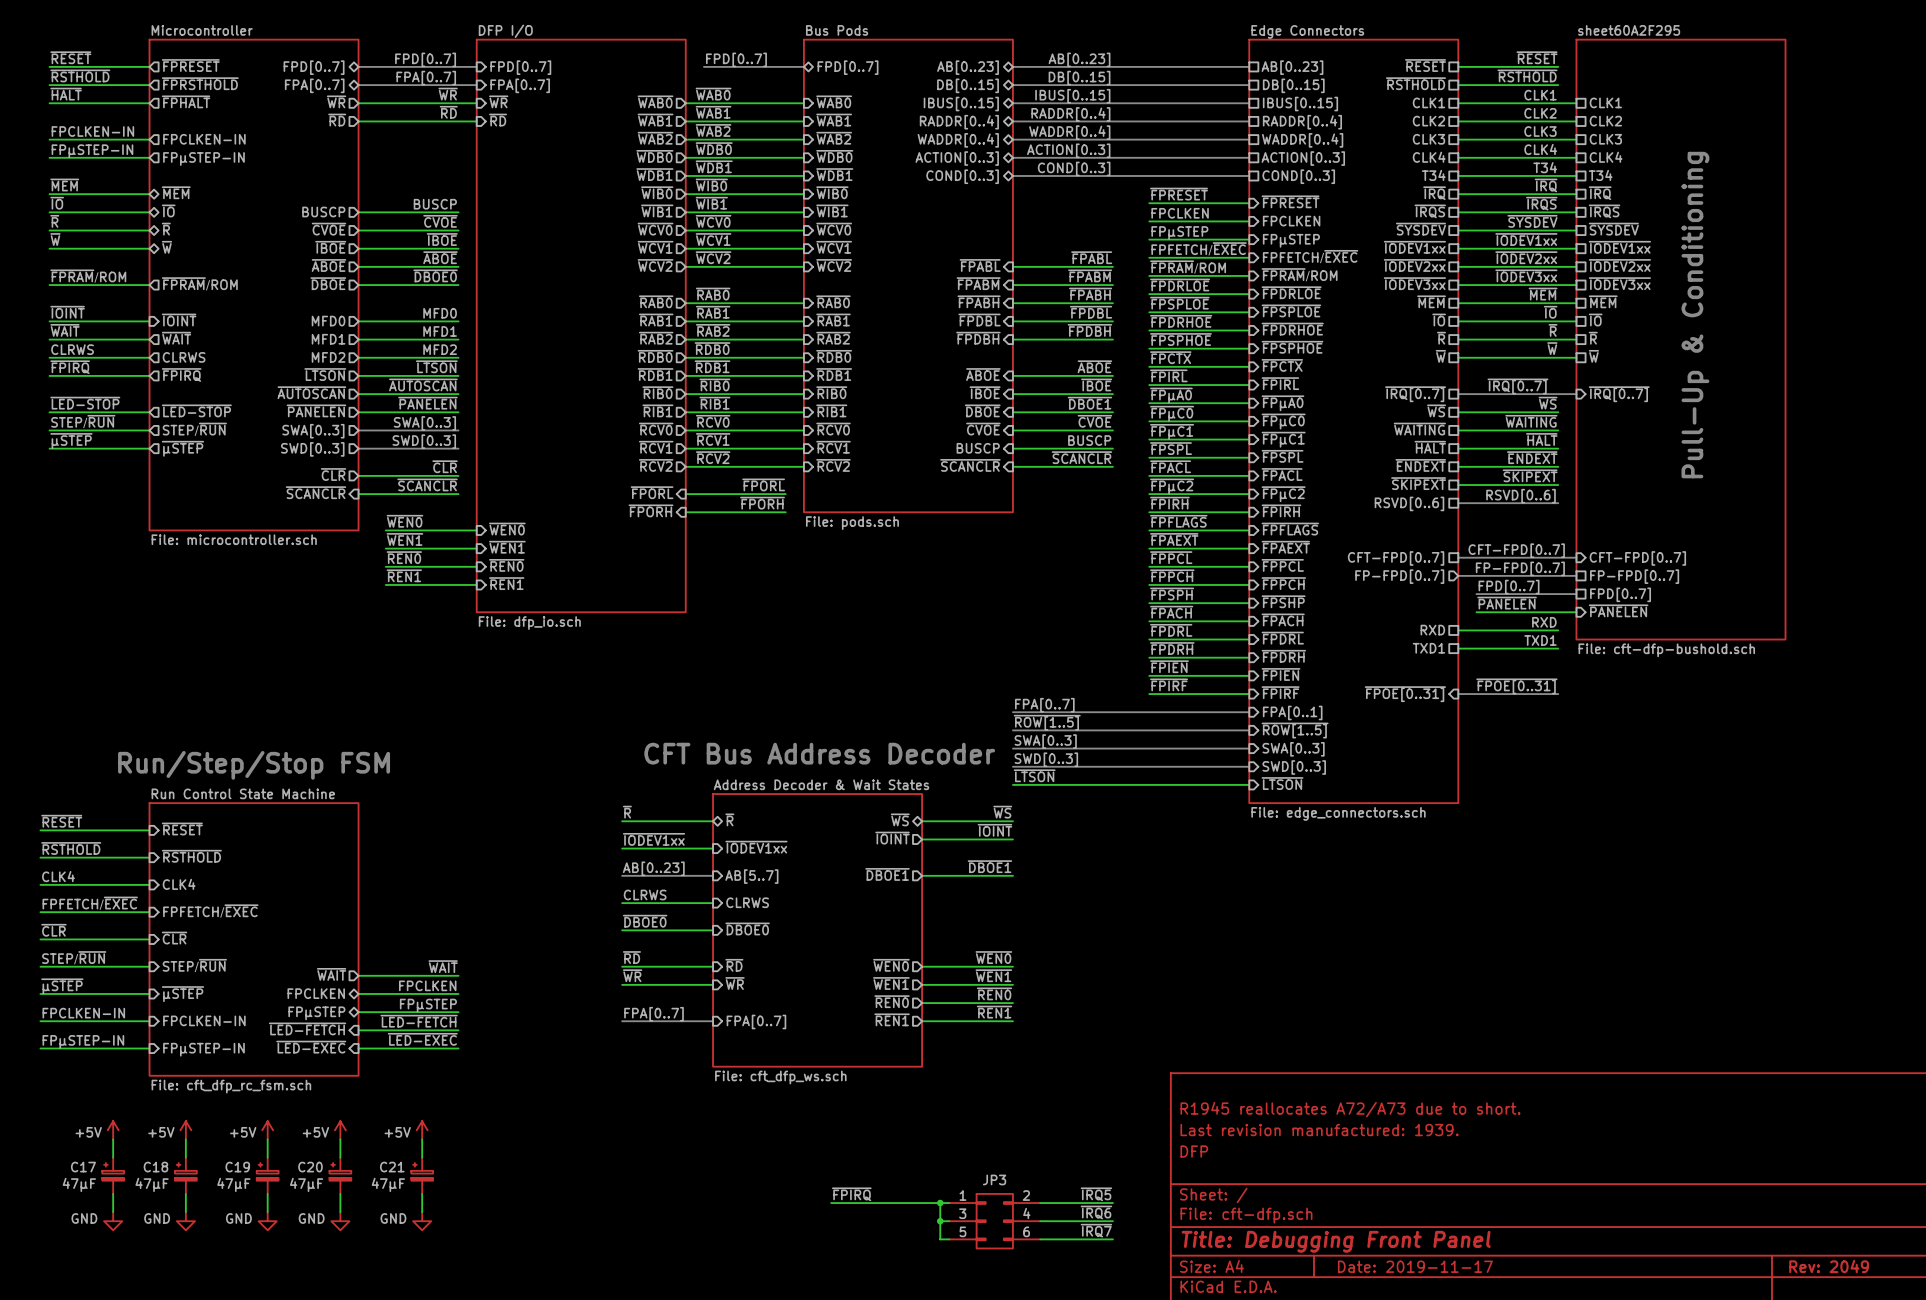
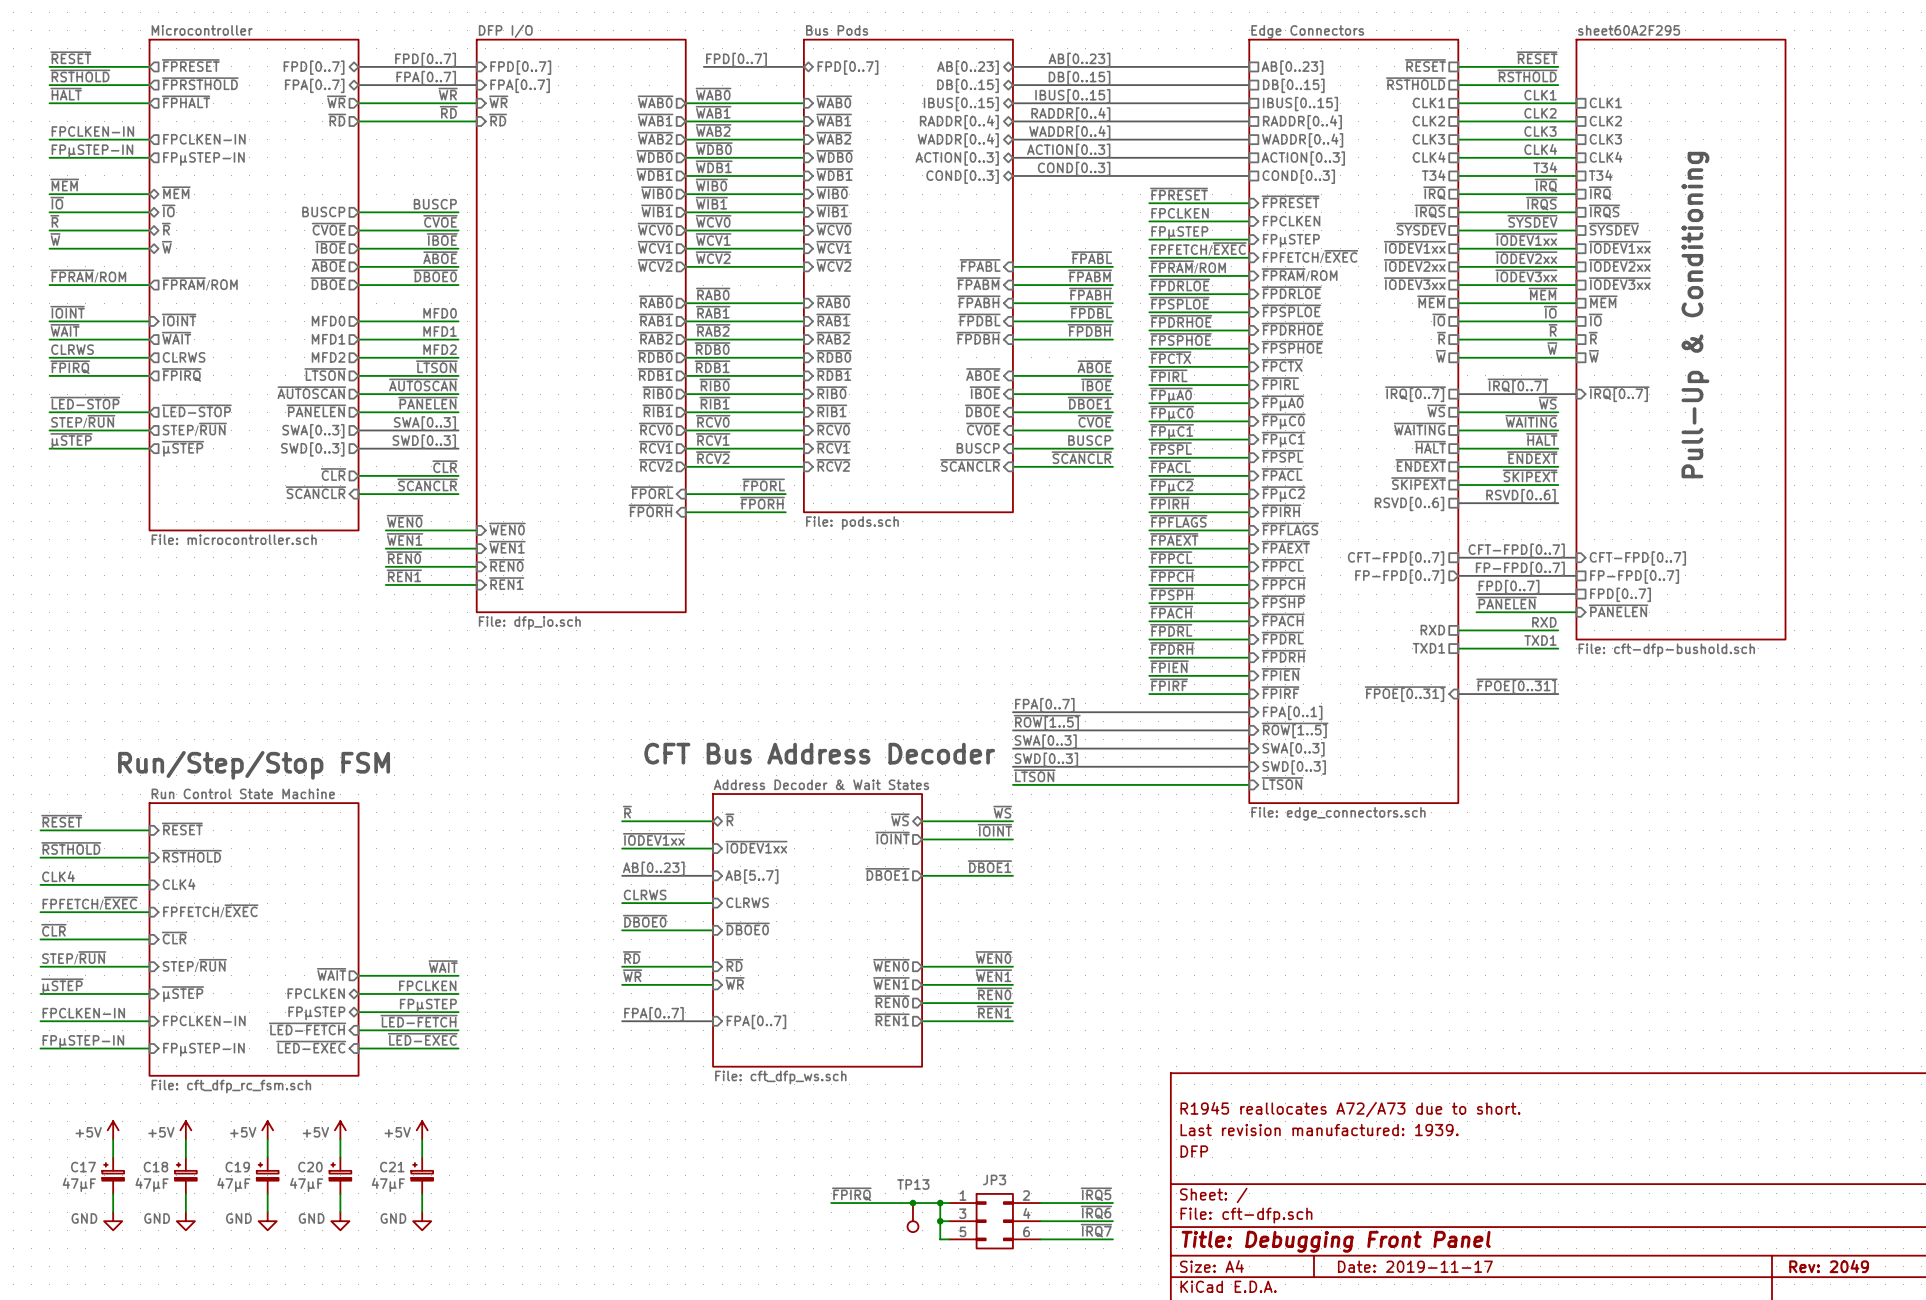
junction: none -> (912, 1203)
TP13: none -> (912, 1217)

